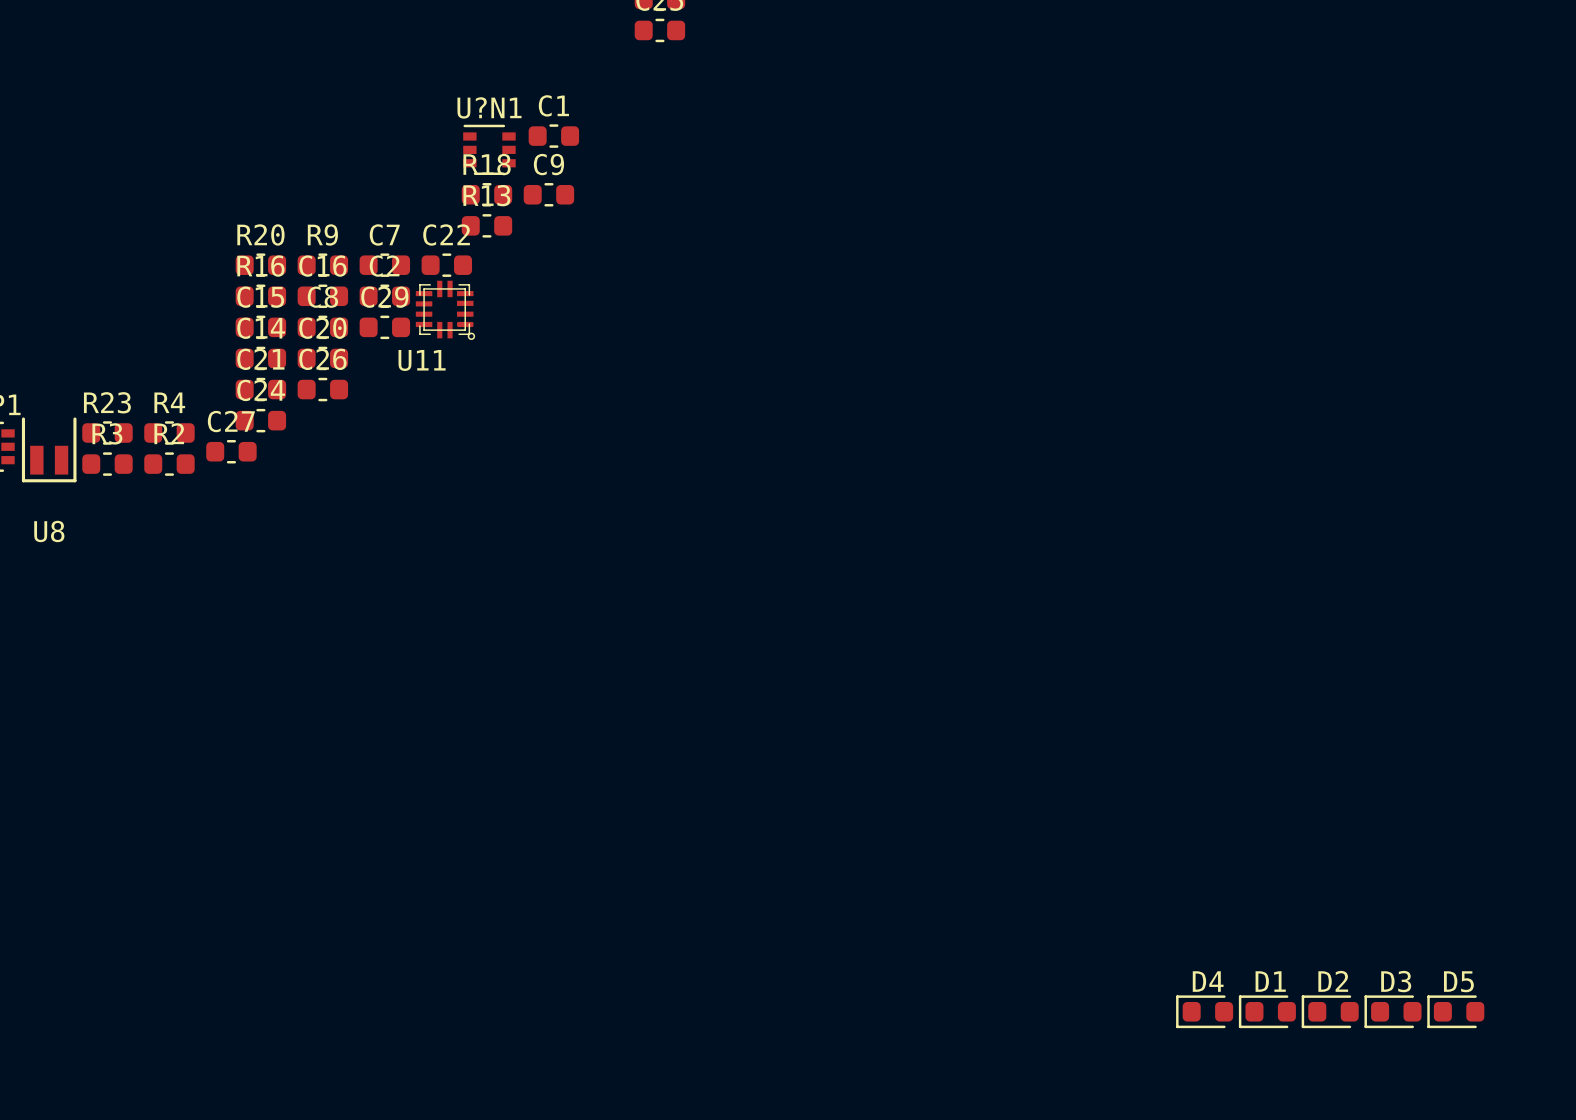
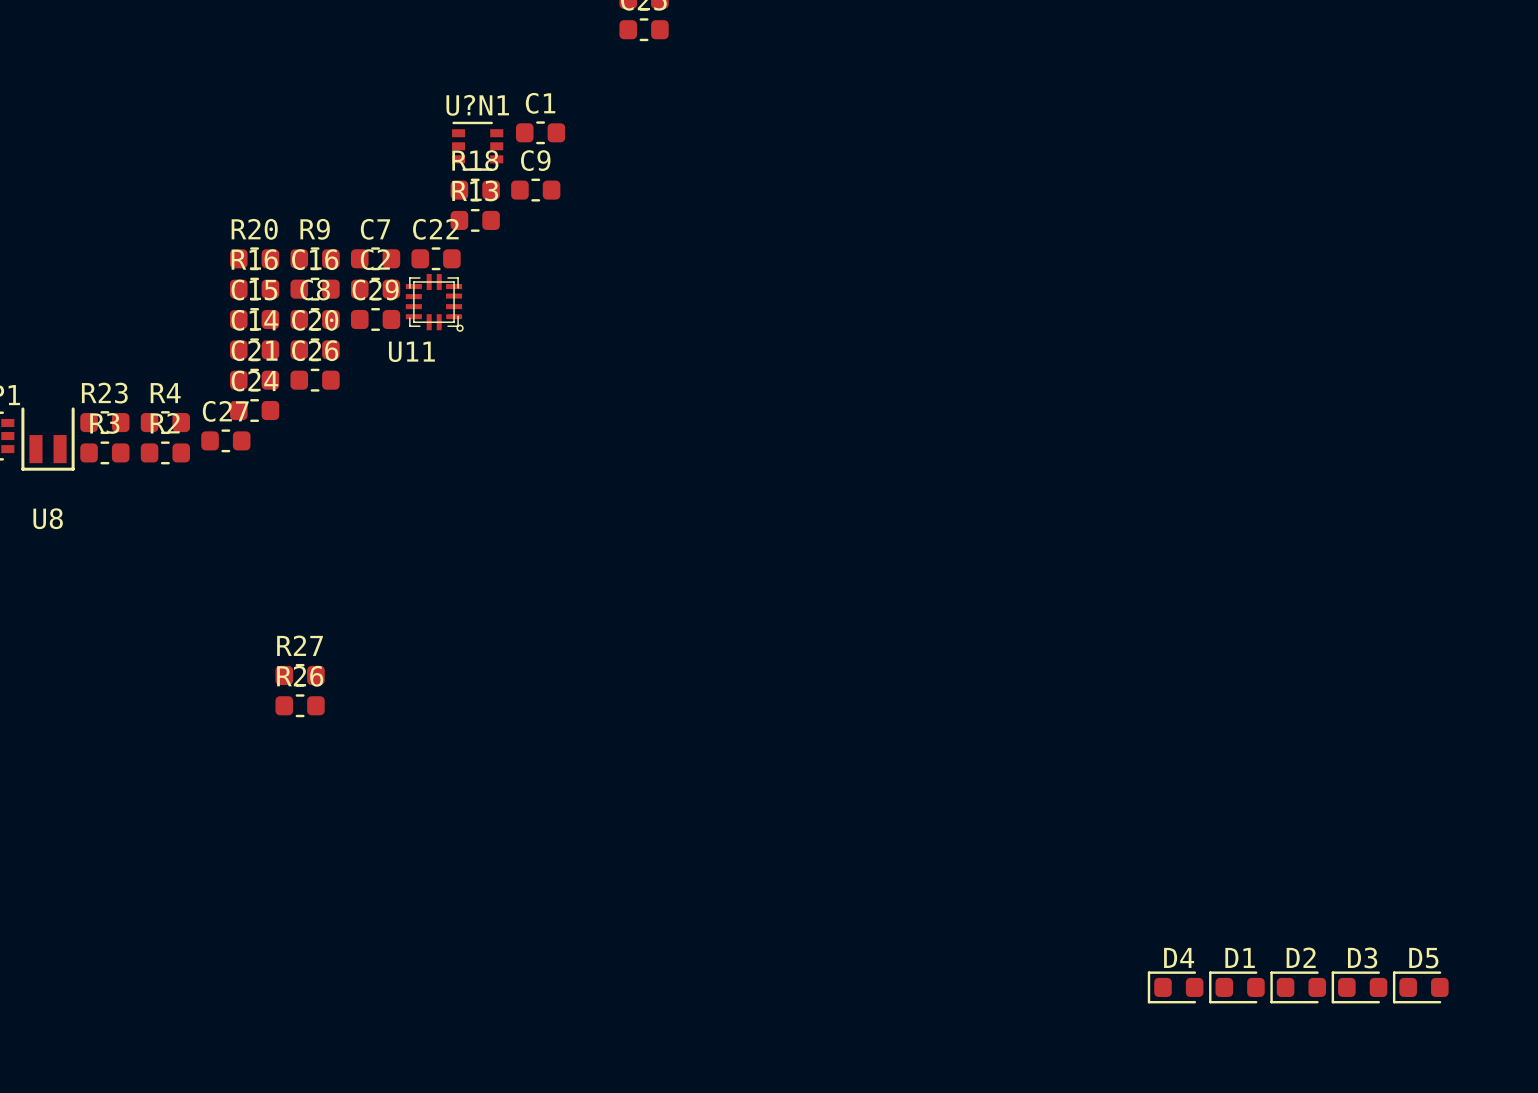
R27: none -> (300, 675)
R26: none -> (300, 705)

